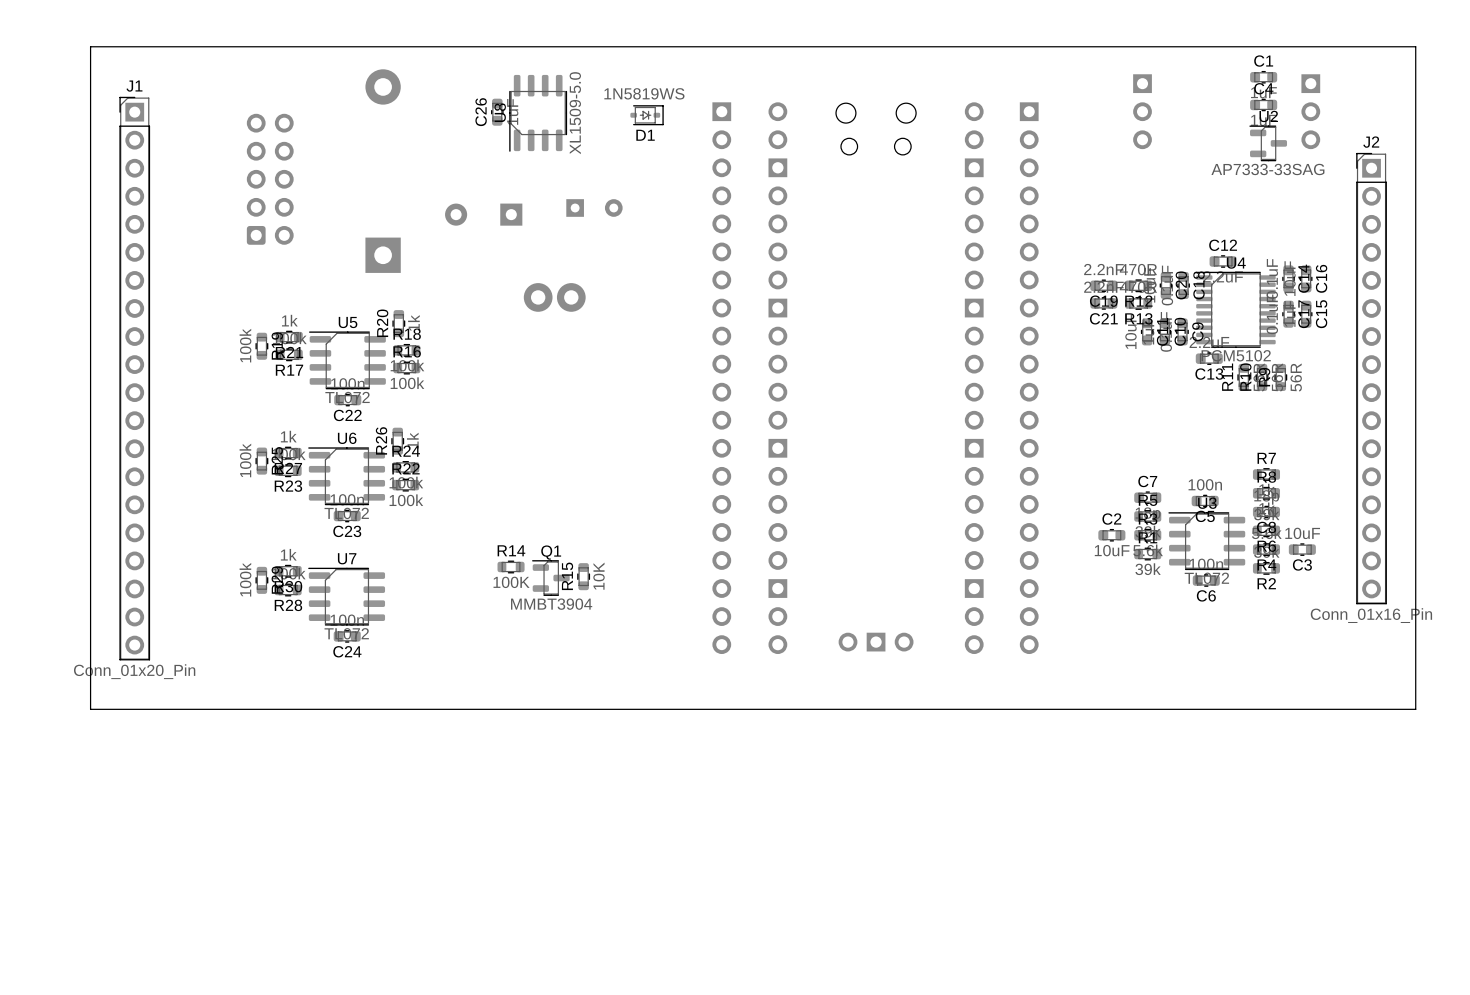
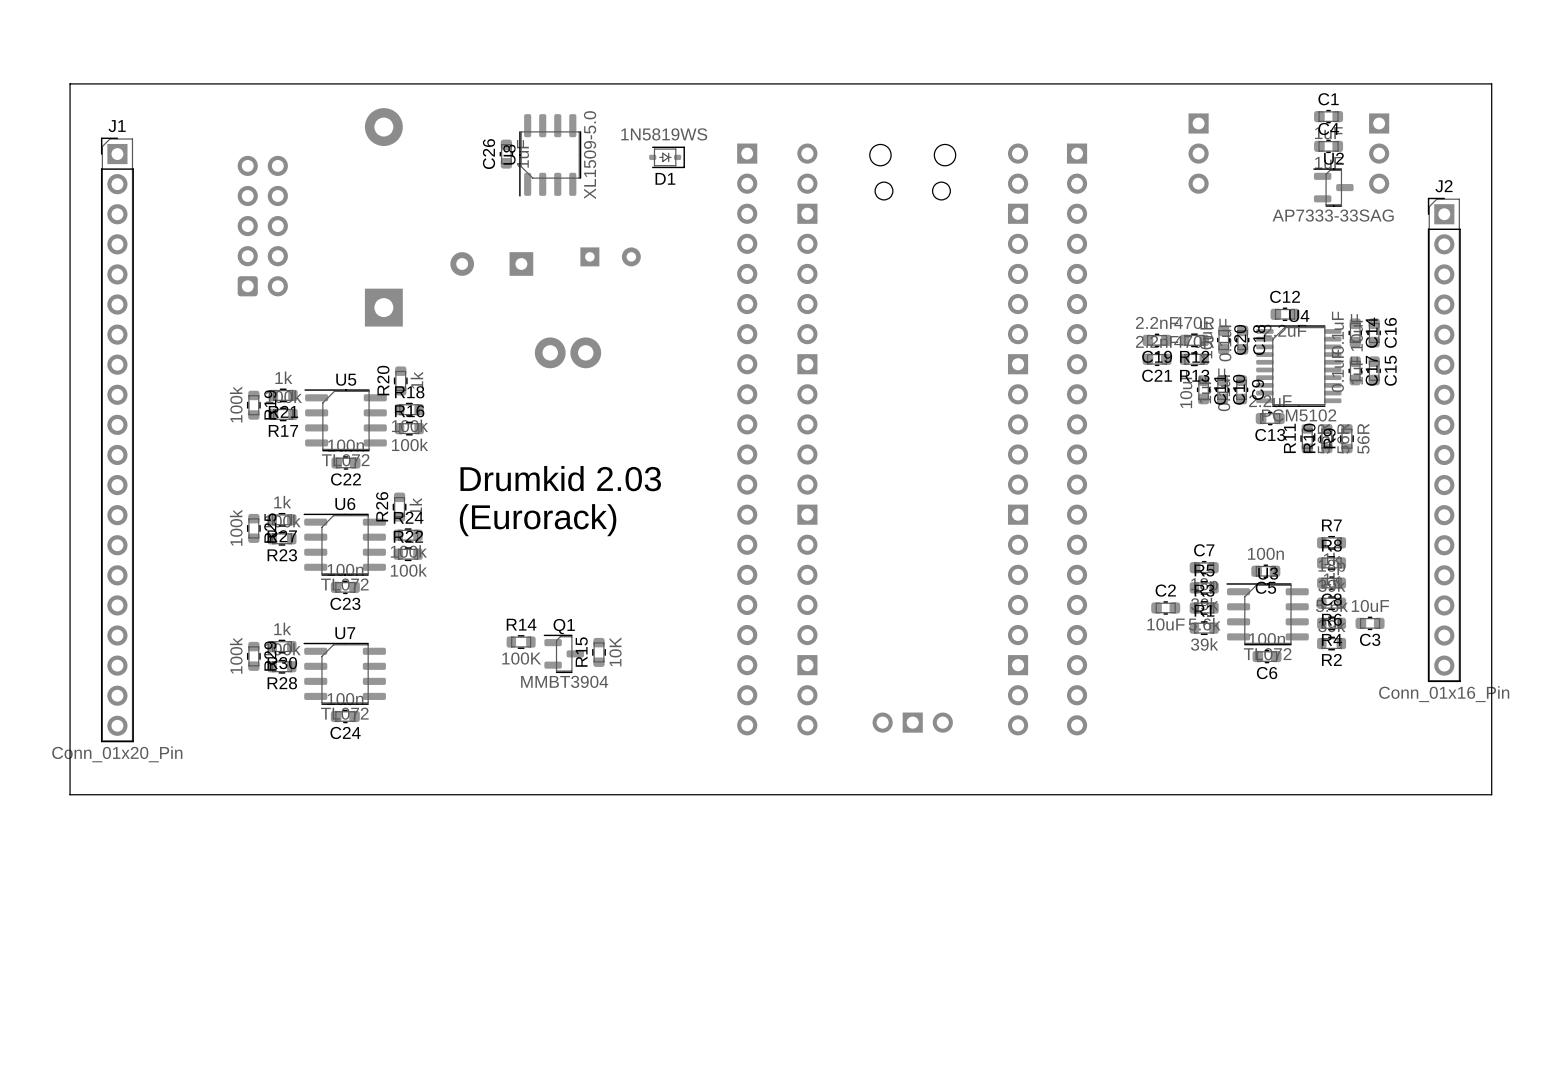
text: none -> Drumkid 2.03 (560, 478)
text: none -> (Eurorack) (538, 520)

